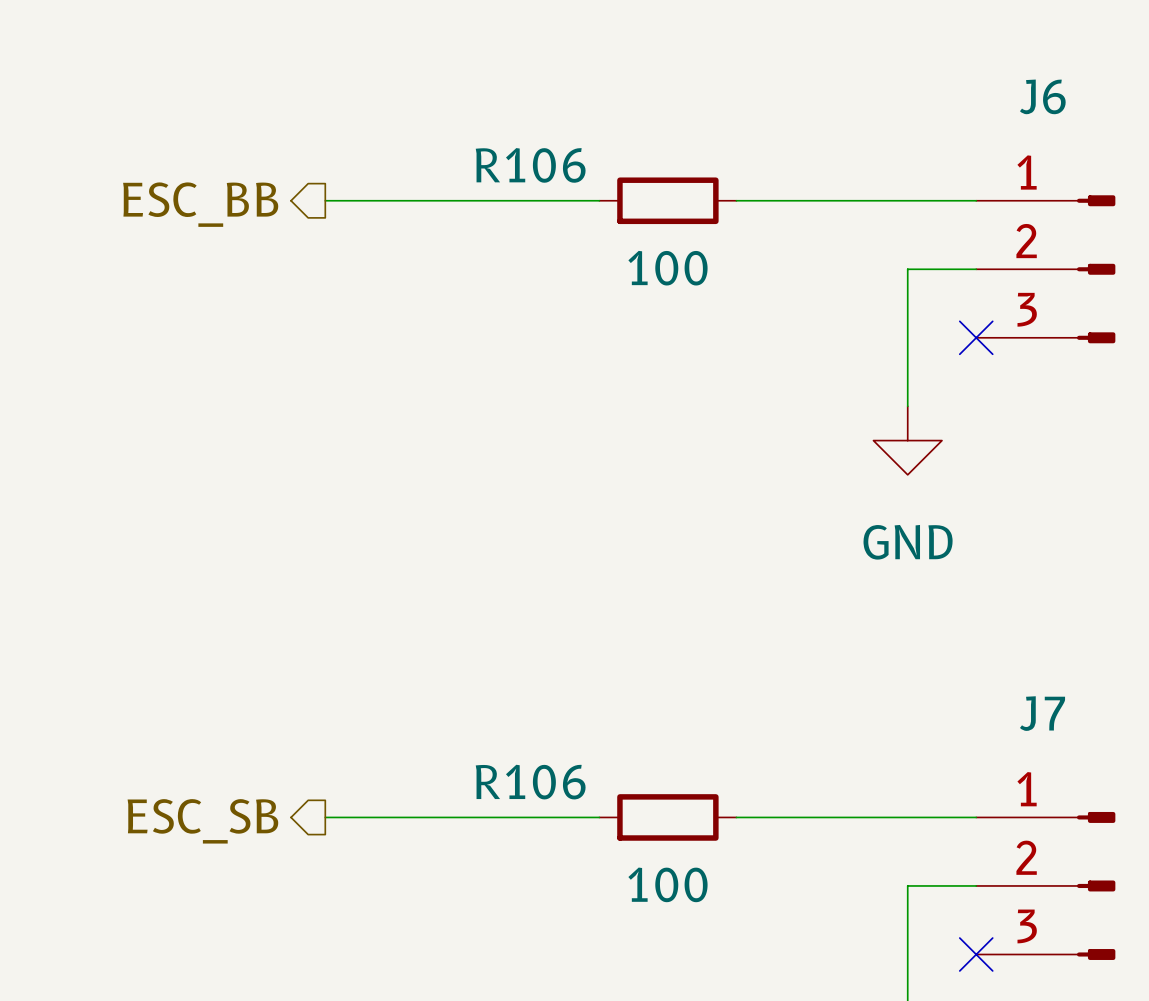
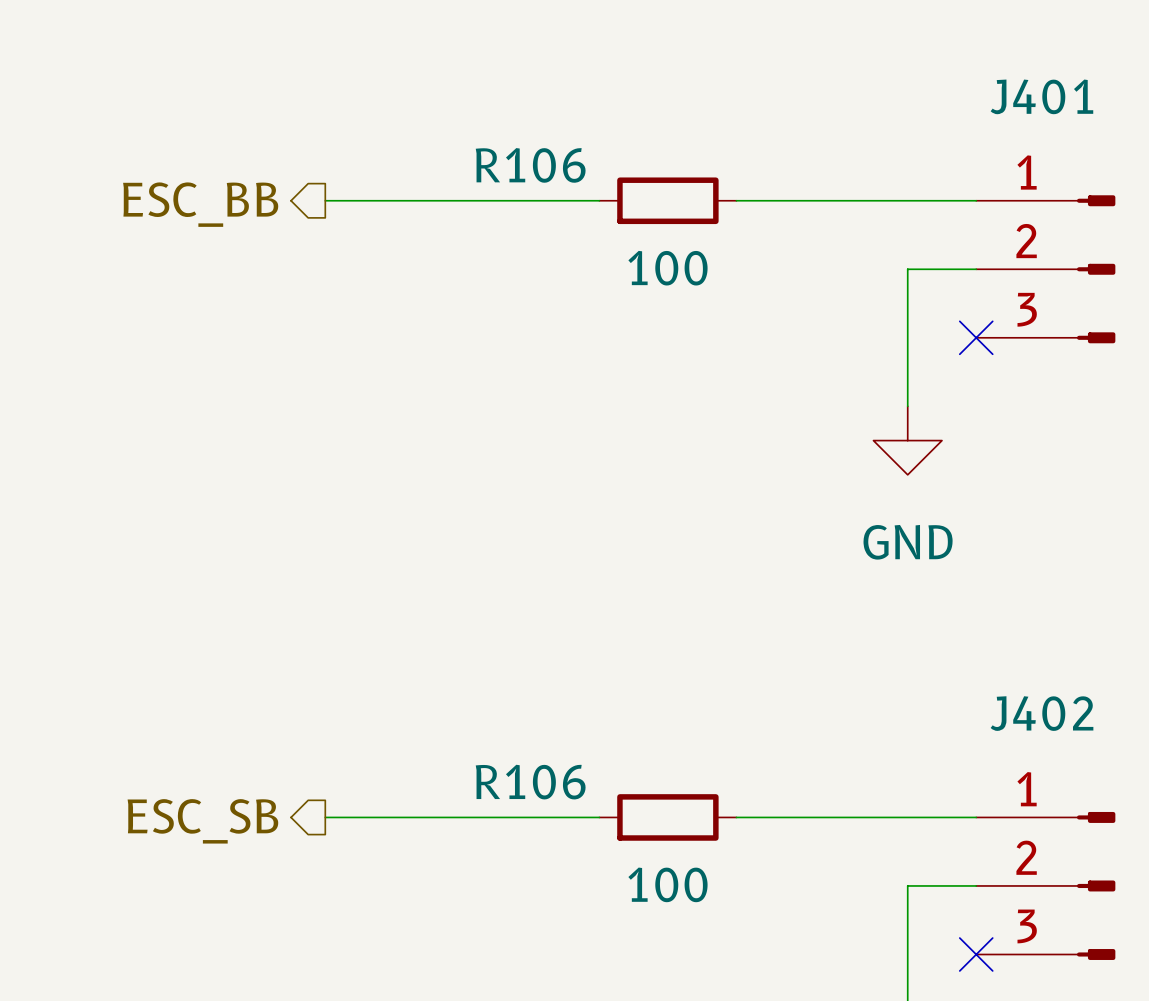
J6 name: J6 (1042, 96) -> J401 (1041, 96)
J7 name: J7 (1042, 713) -> J402 (1042, 713)

